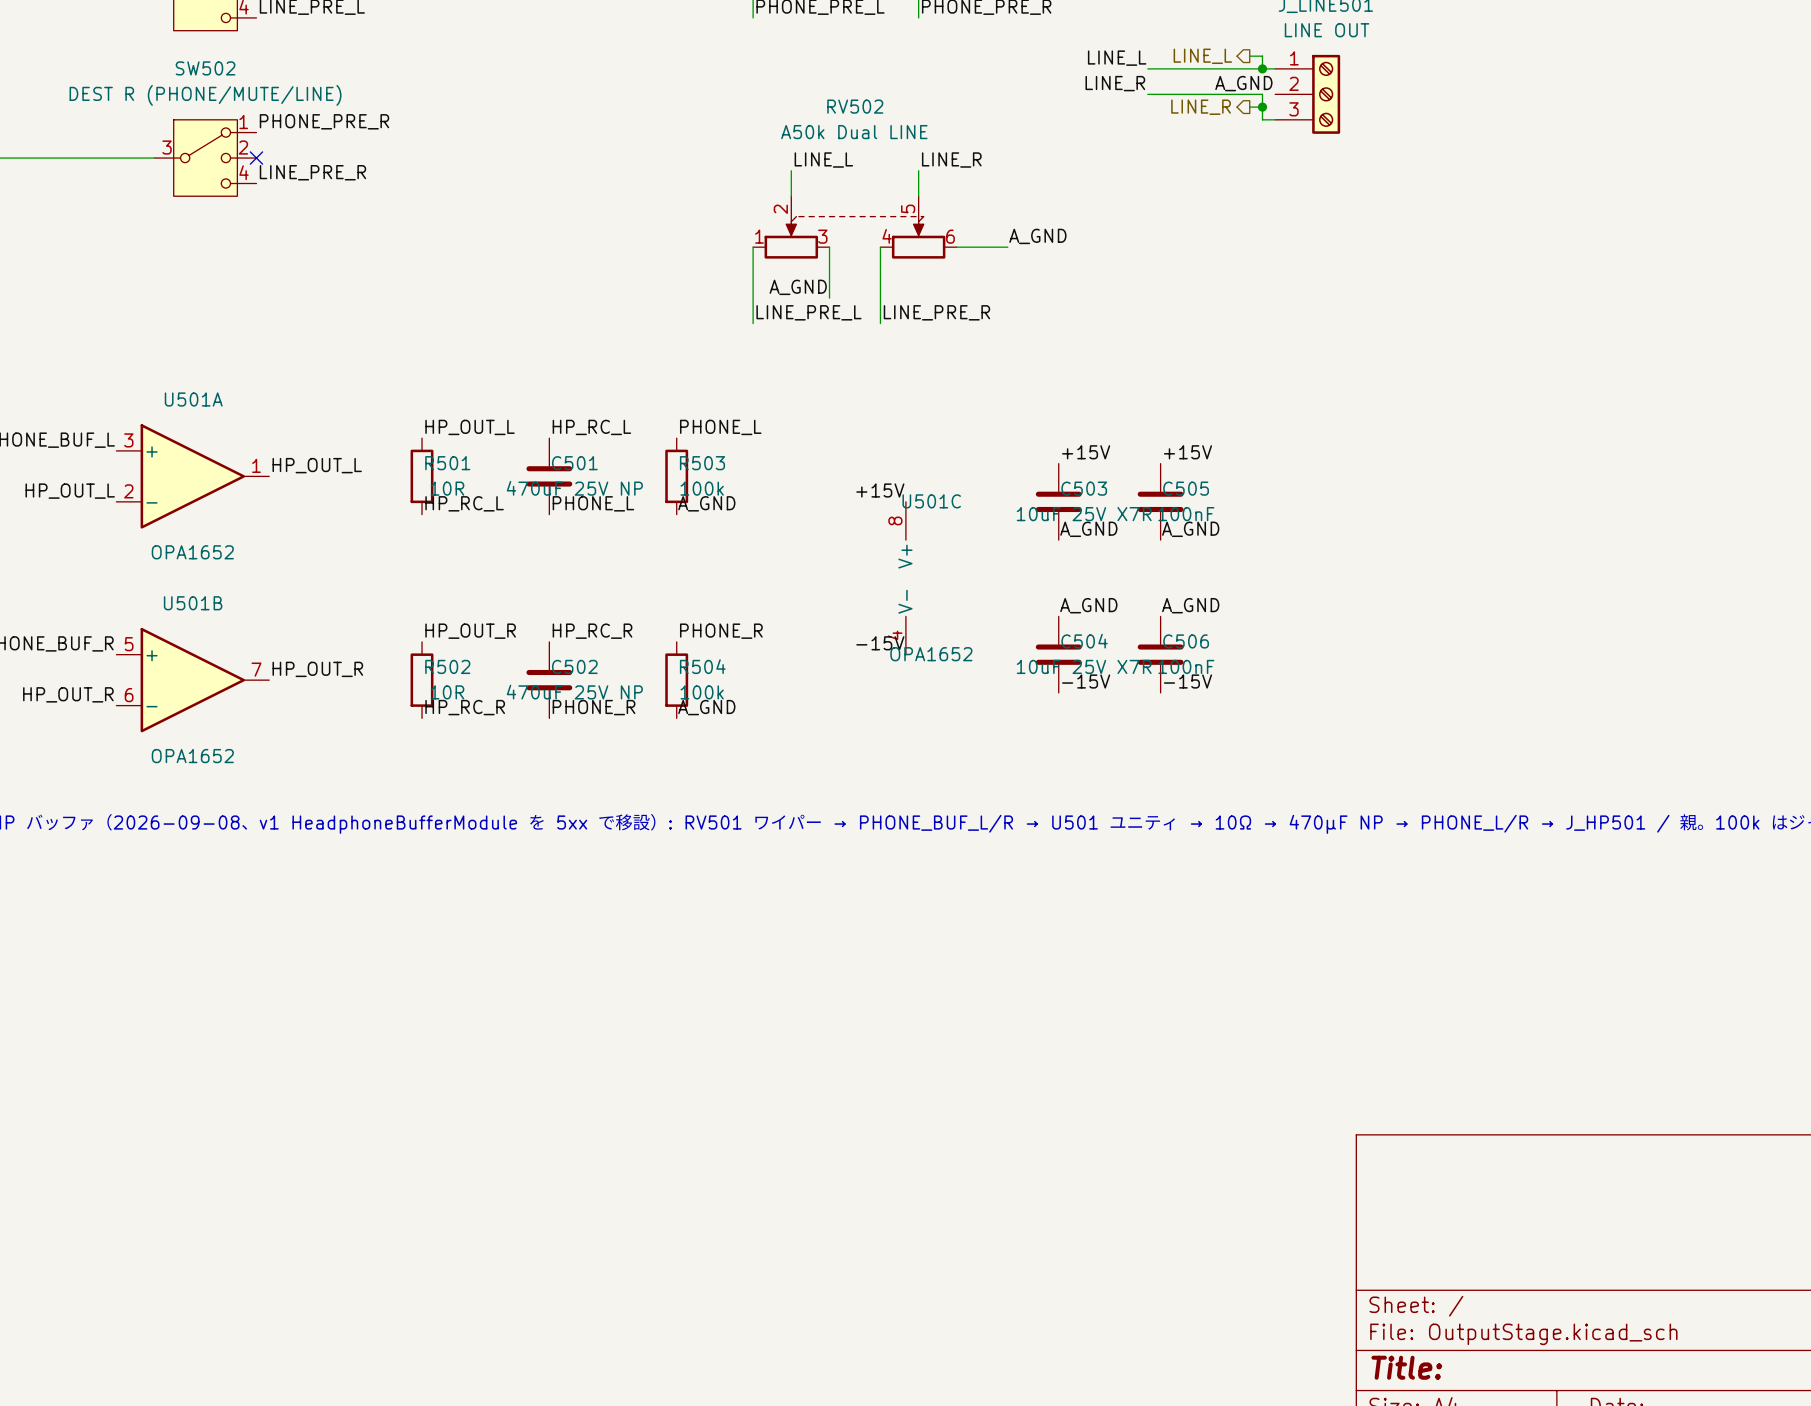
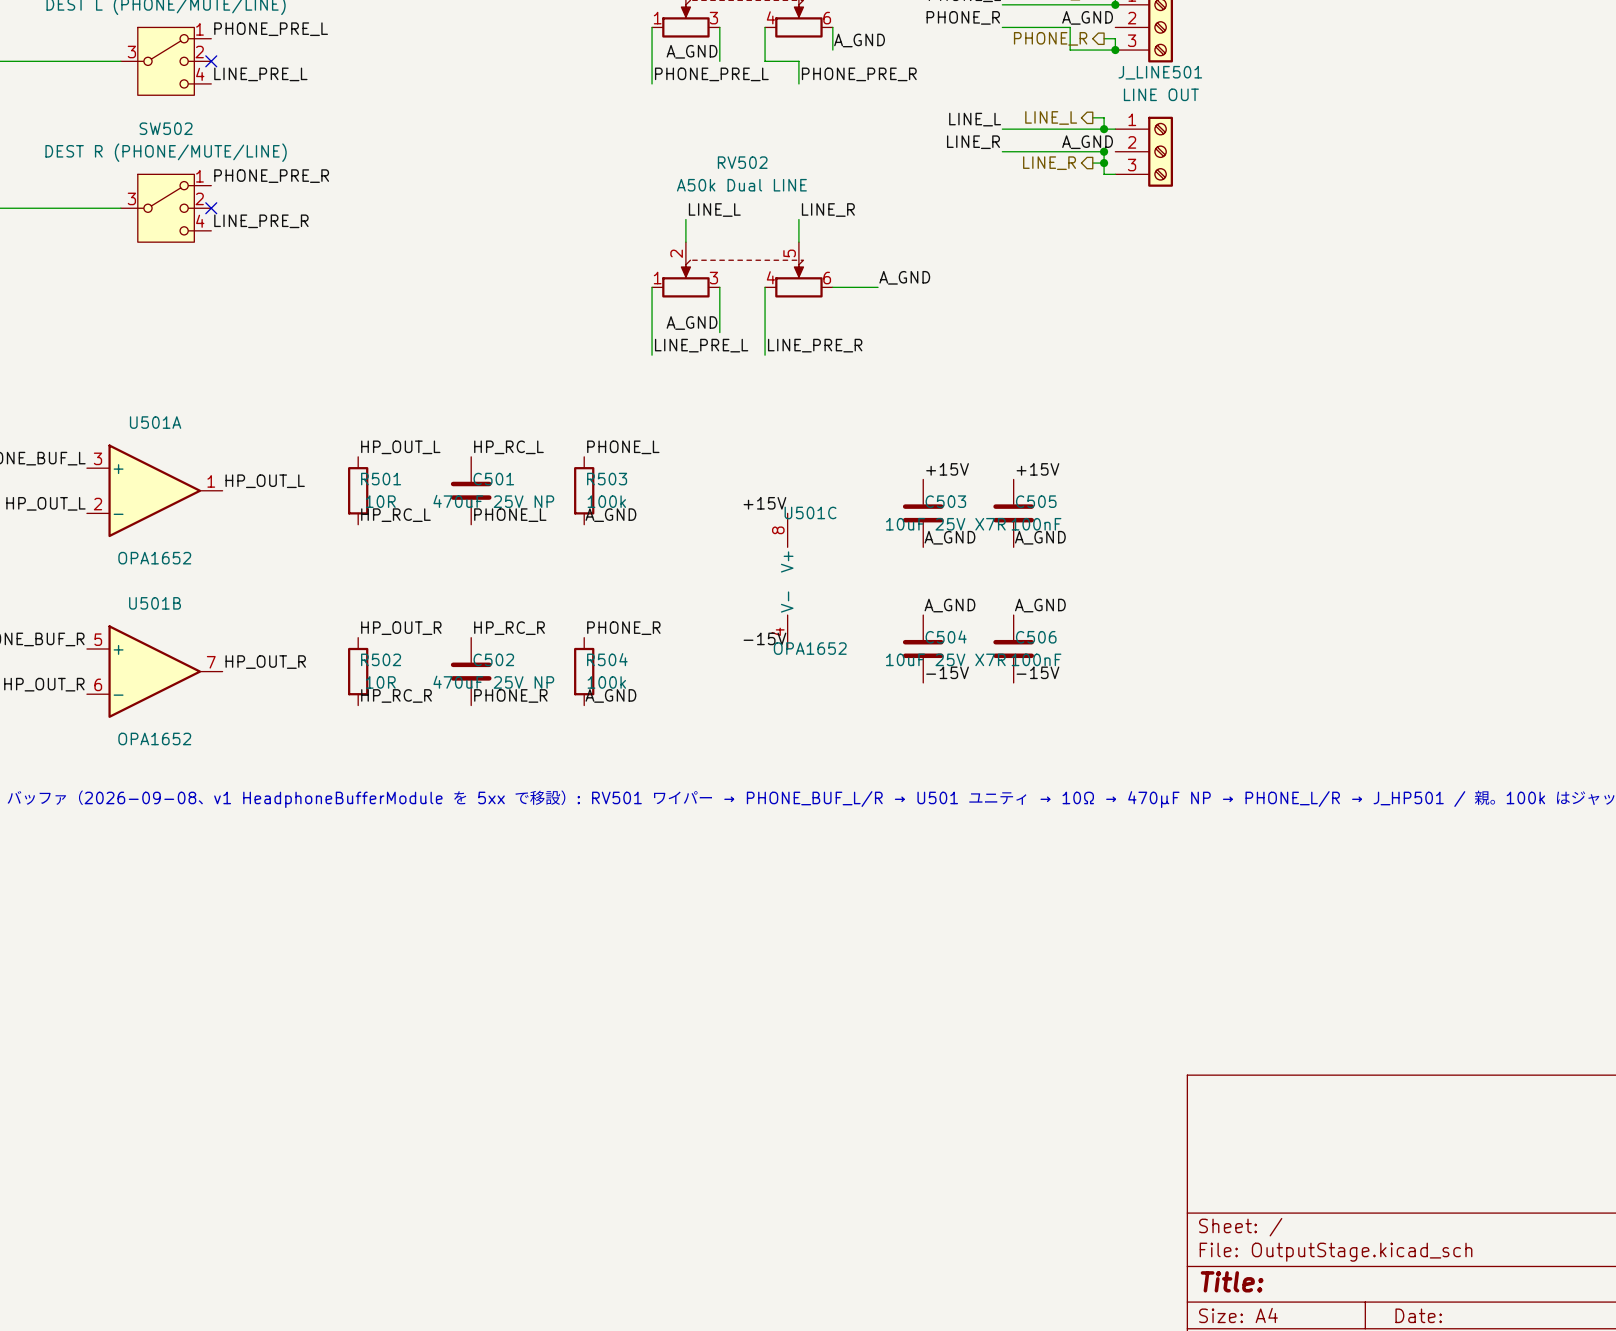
junction: none -> (1104, 151)

